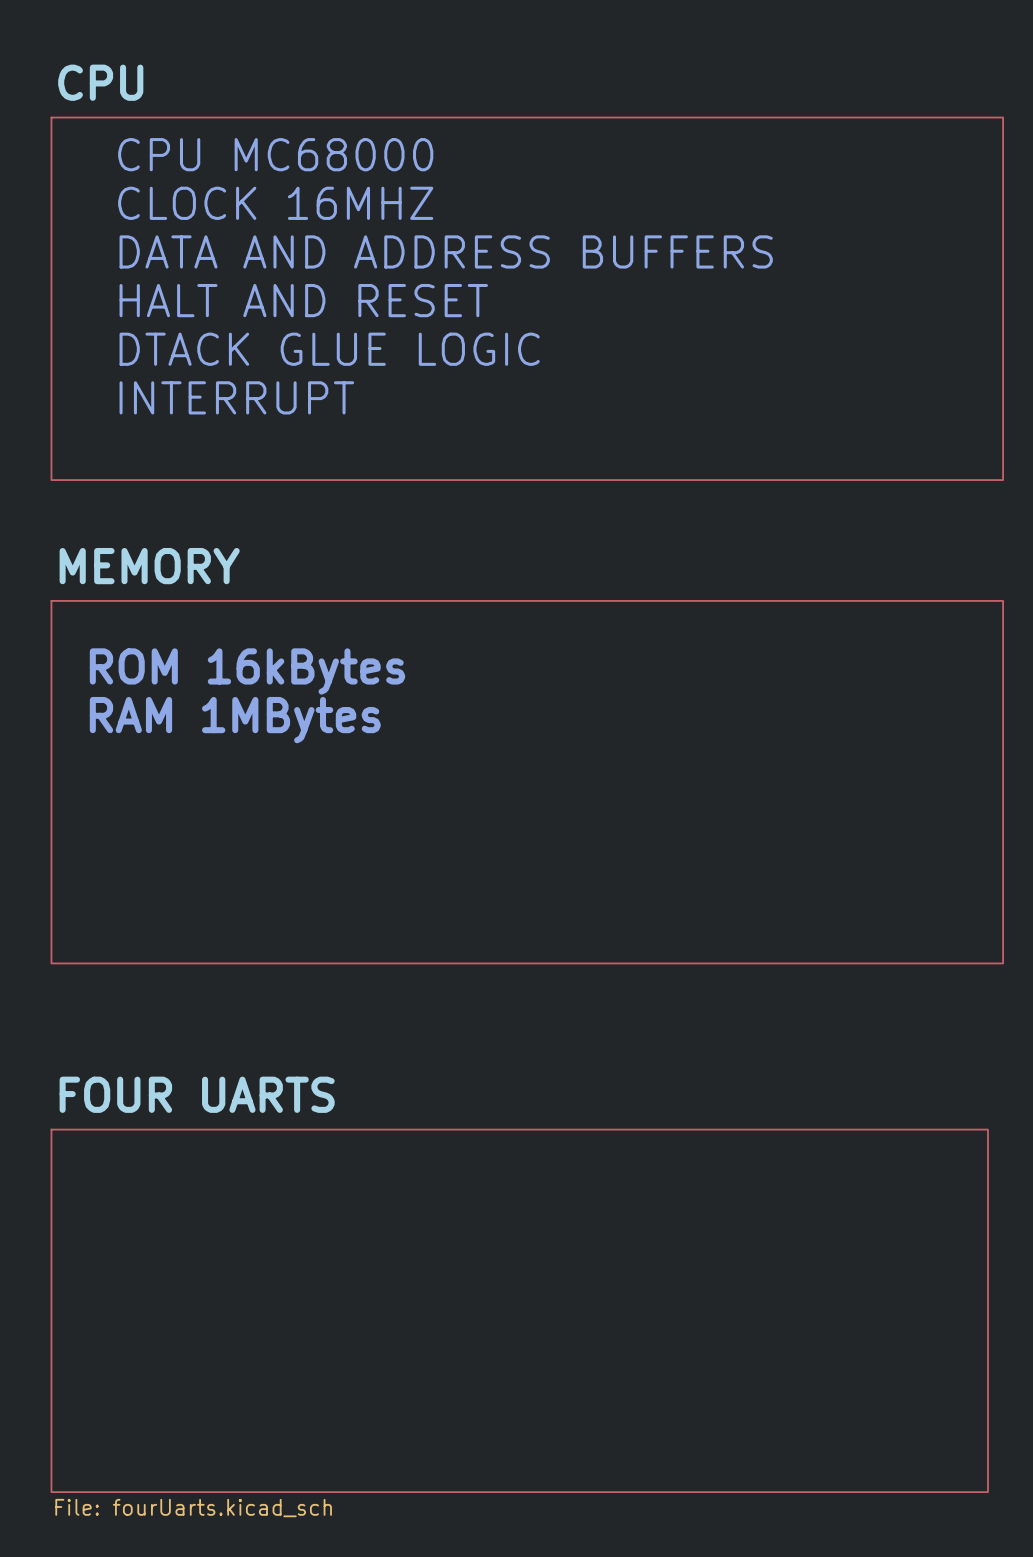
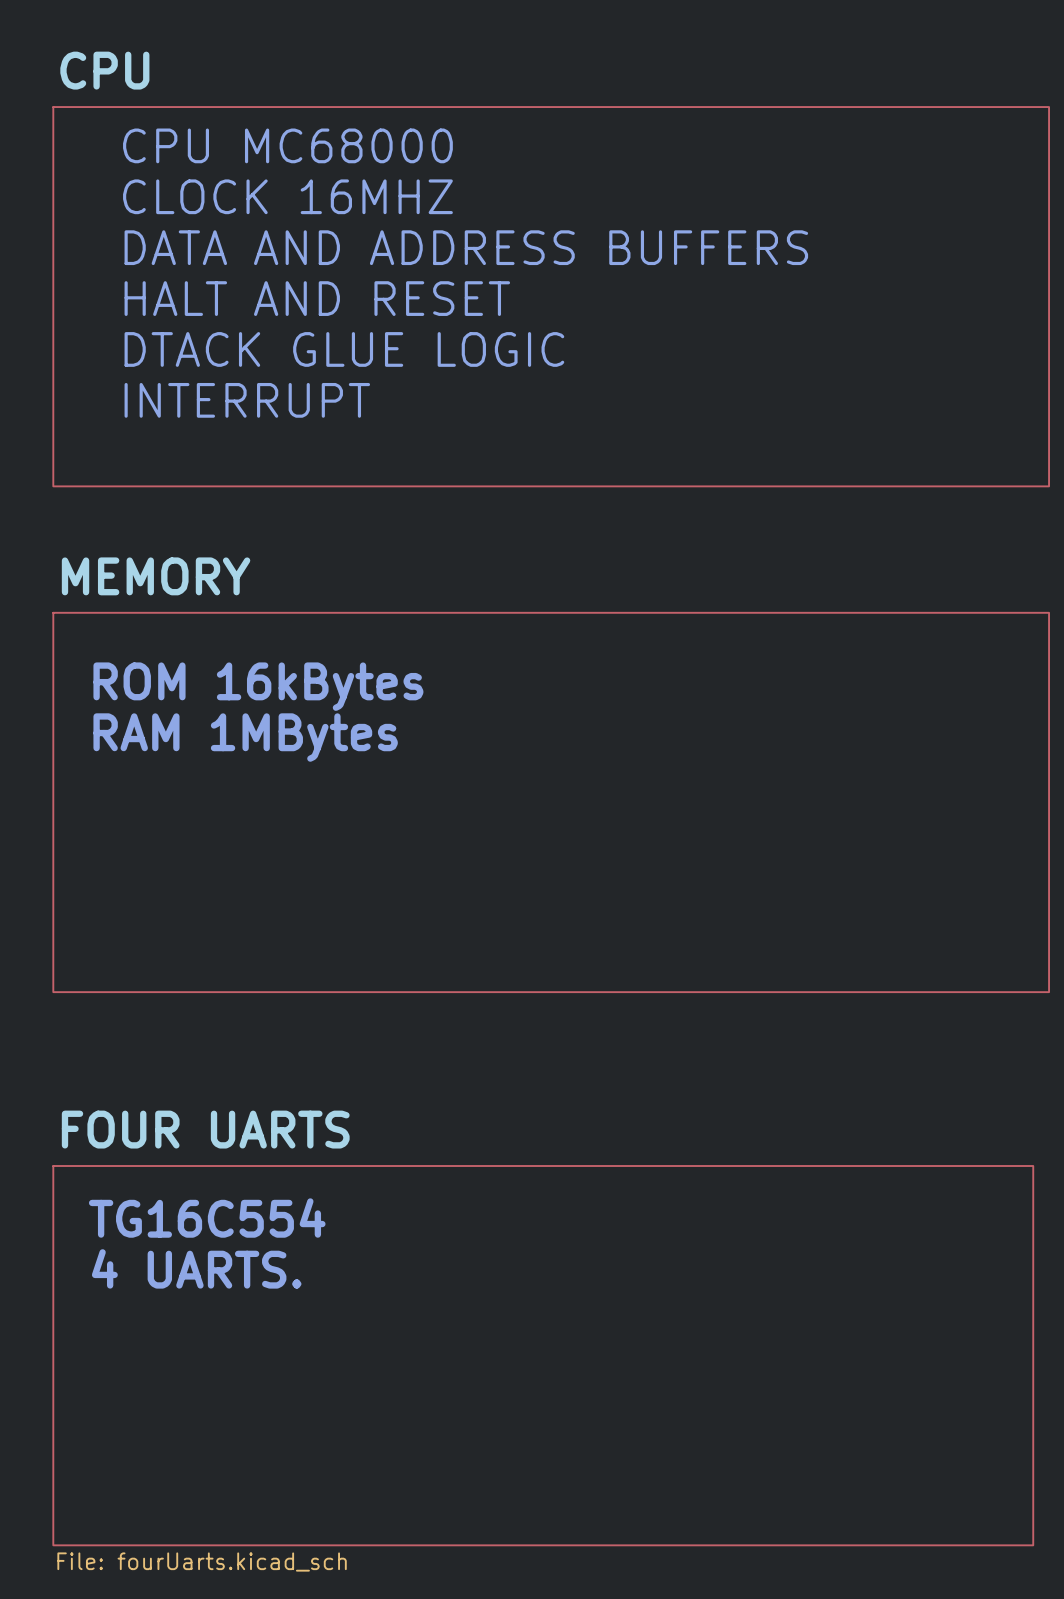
text: none -> TG16C554 (207, 1218)
text: none -> 4 UARTS. (196, 1268)

